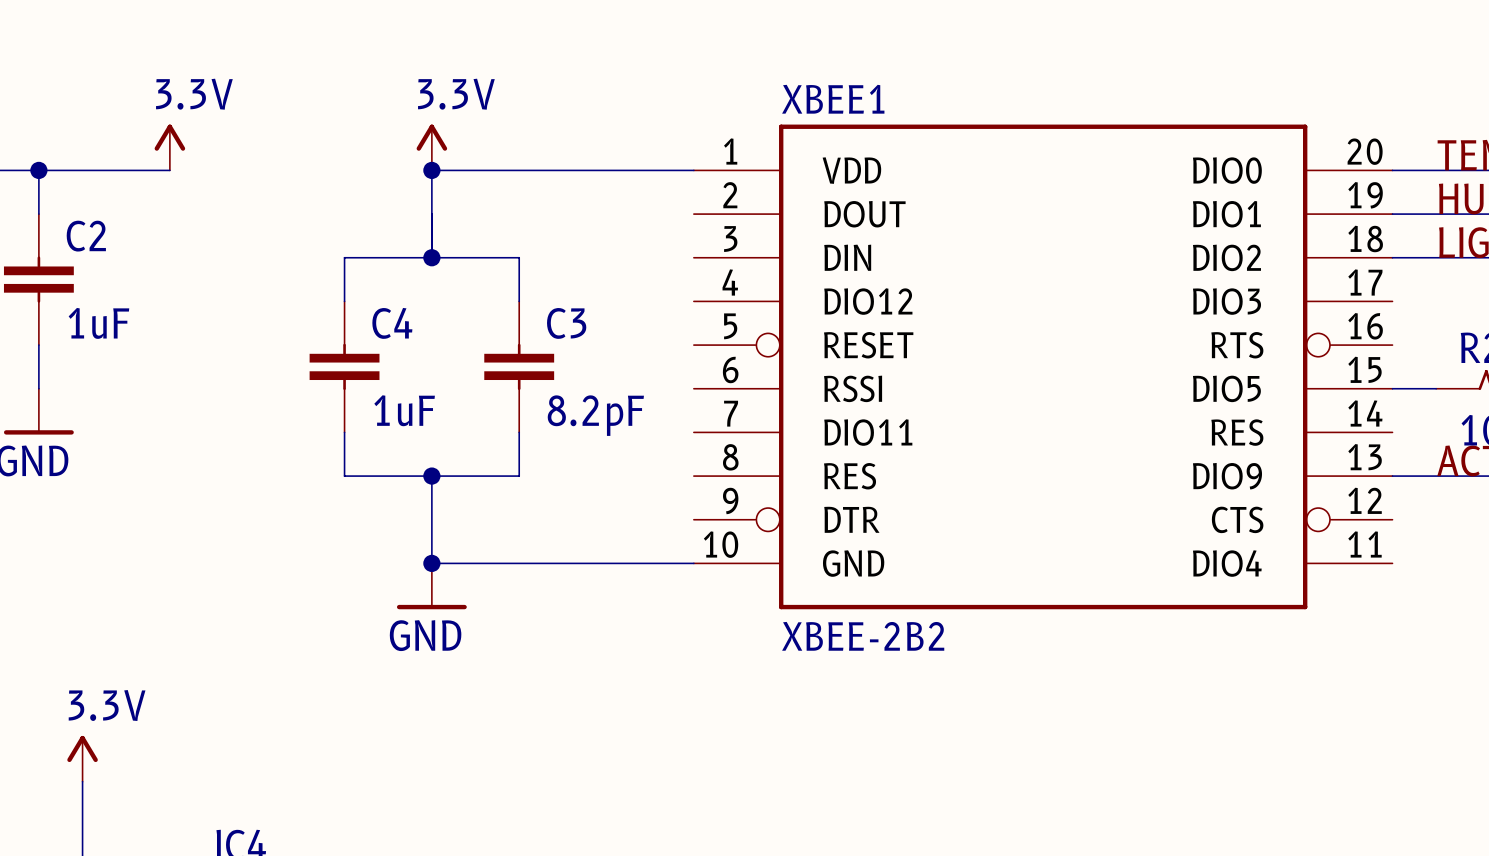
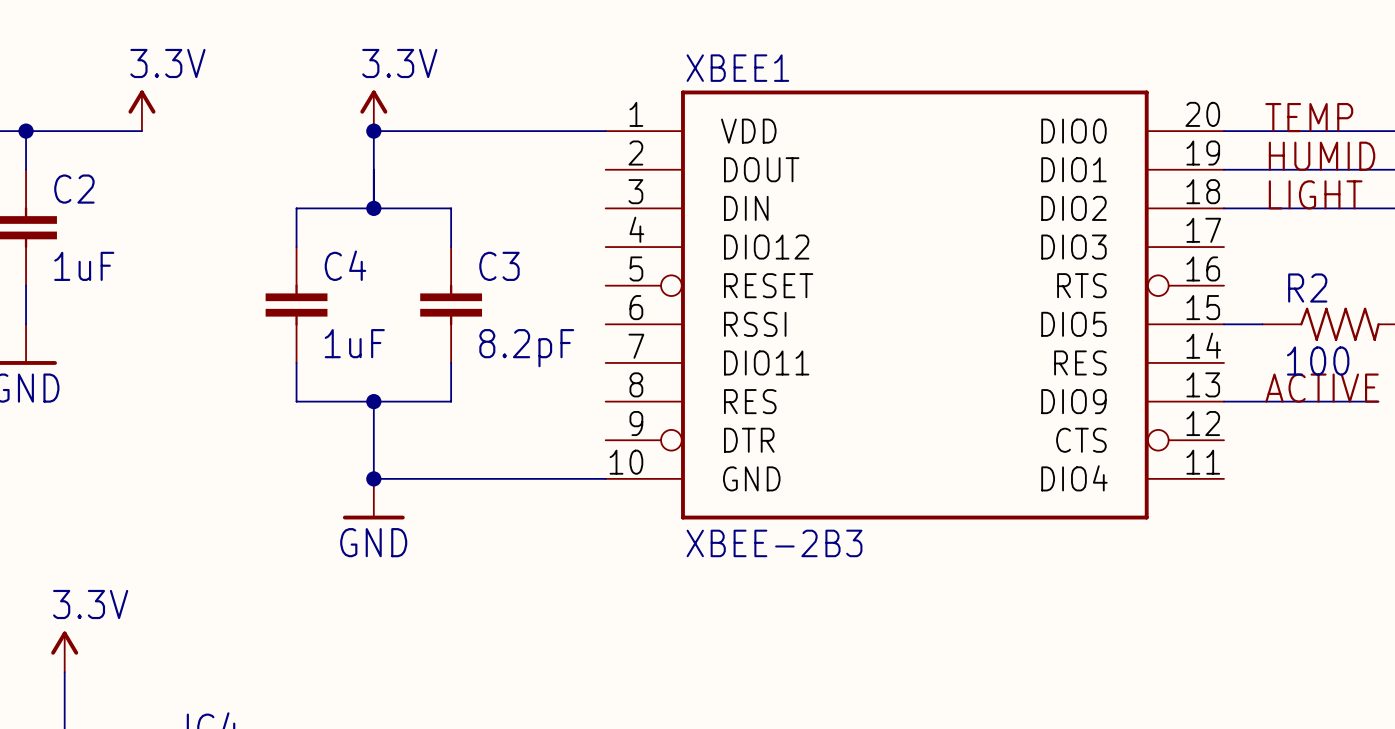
XBEE1 value: XBEE-2B2 (863, 636) -> XBEE-2B3 (774, 543)

